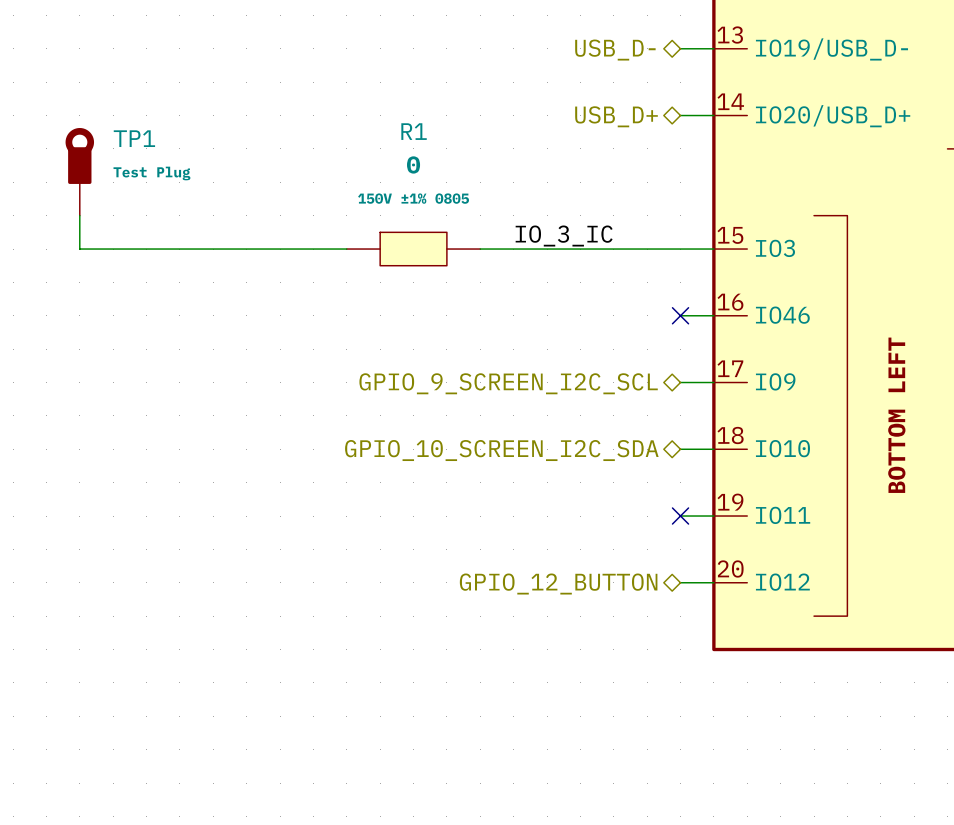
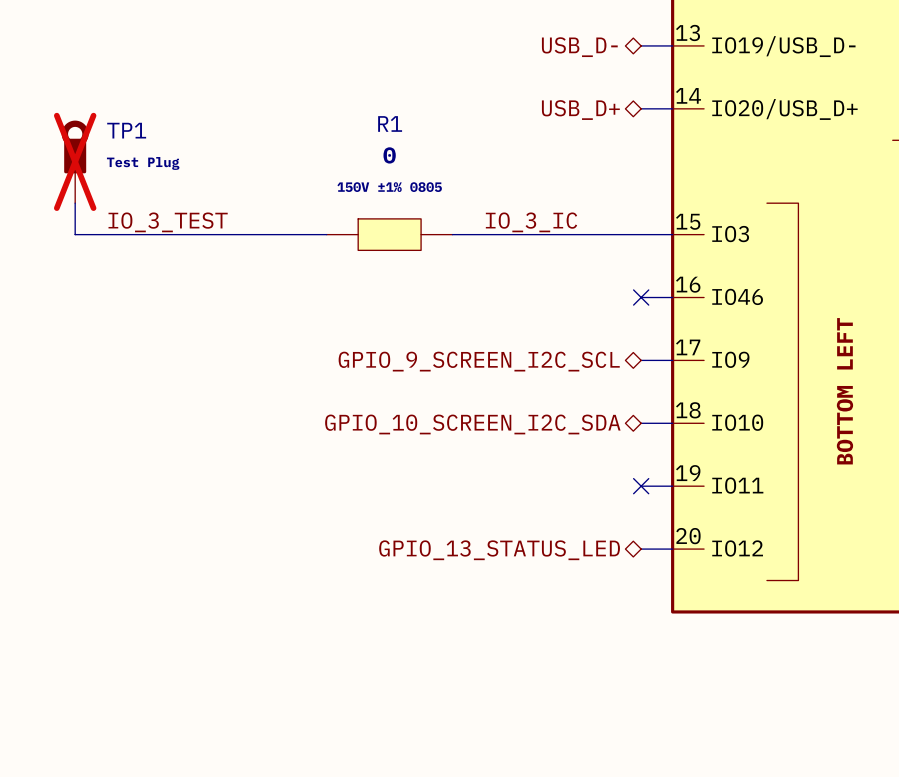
TP1 do-not-place cross: none -> (75, 161)
label: none -> IO_3_TEST (168, 222)
hierarchical label: GPIO_12_BUTTON (558, 584) -> GPIO_13_STATUS_LED (499, 550)

